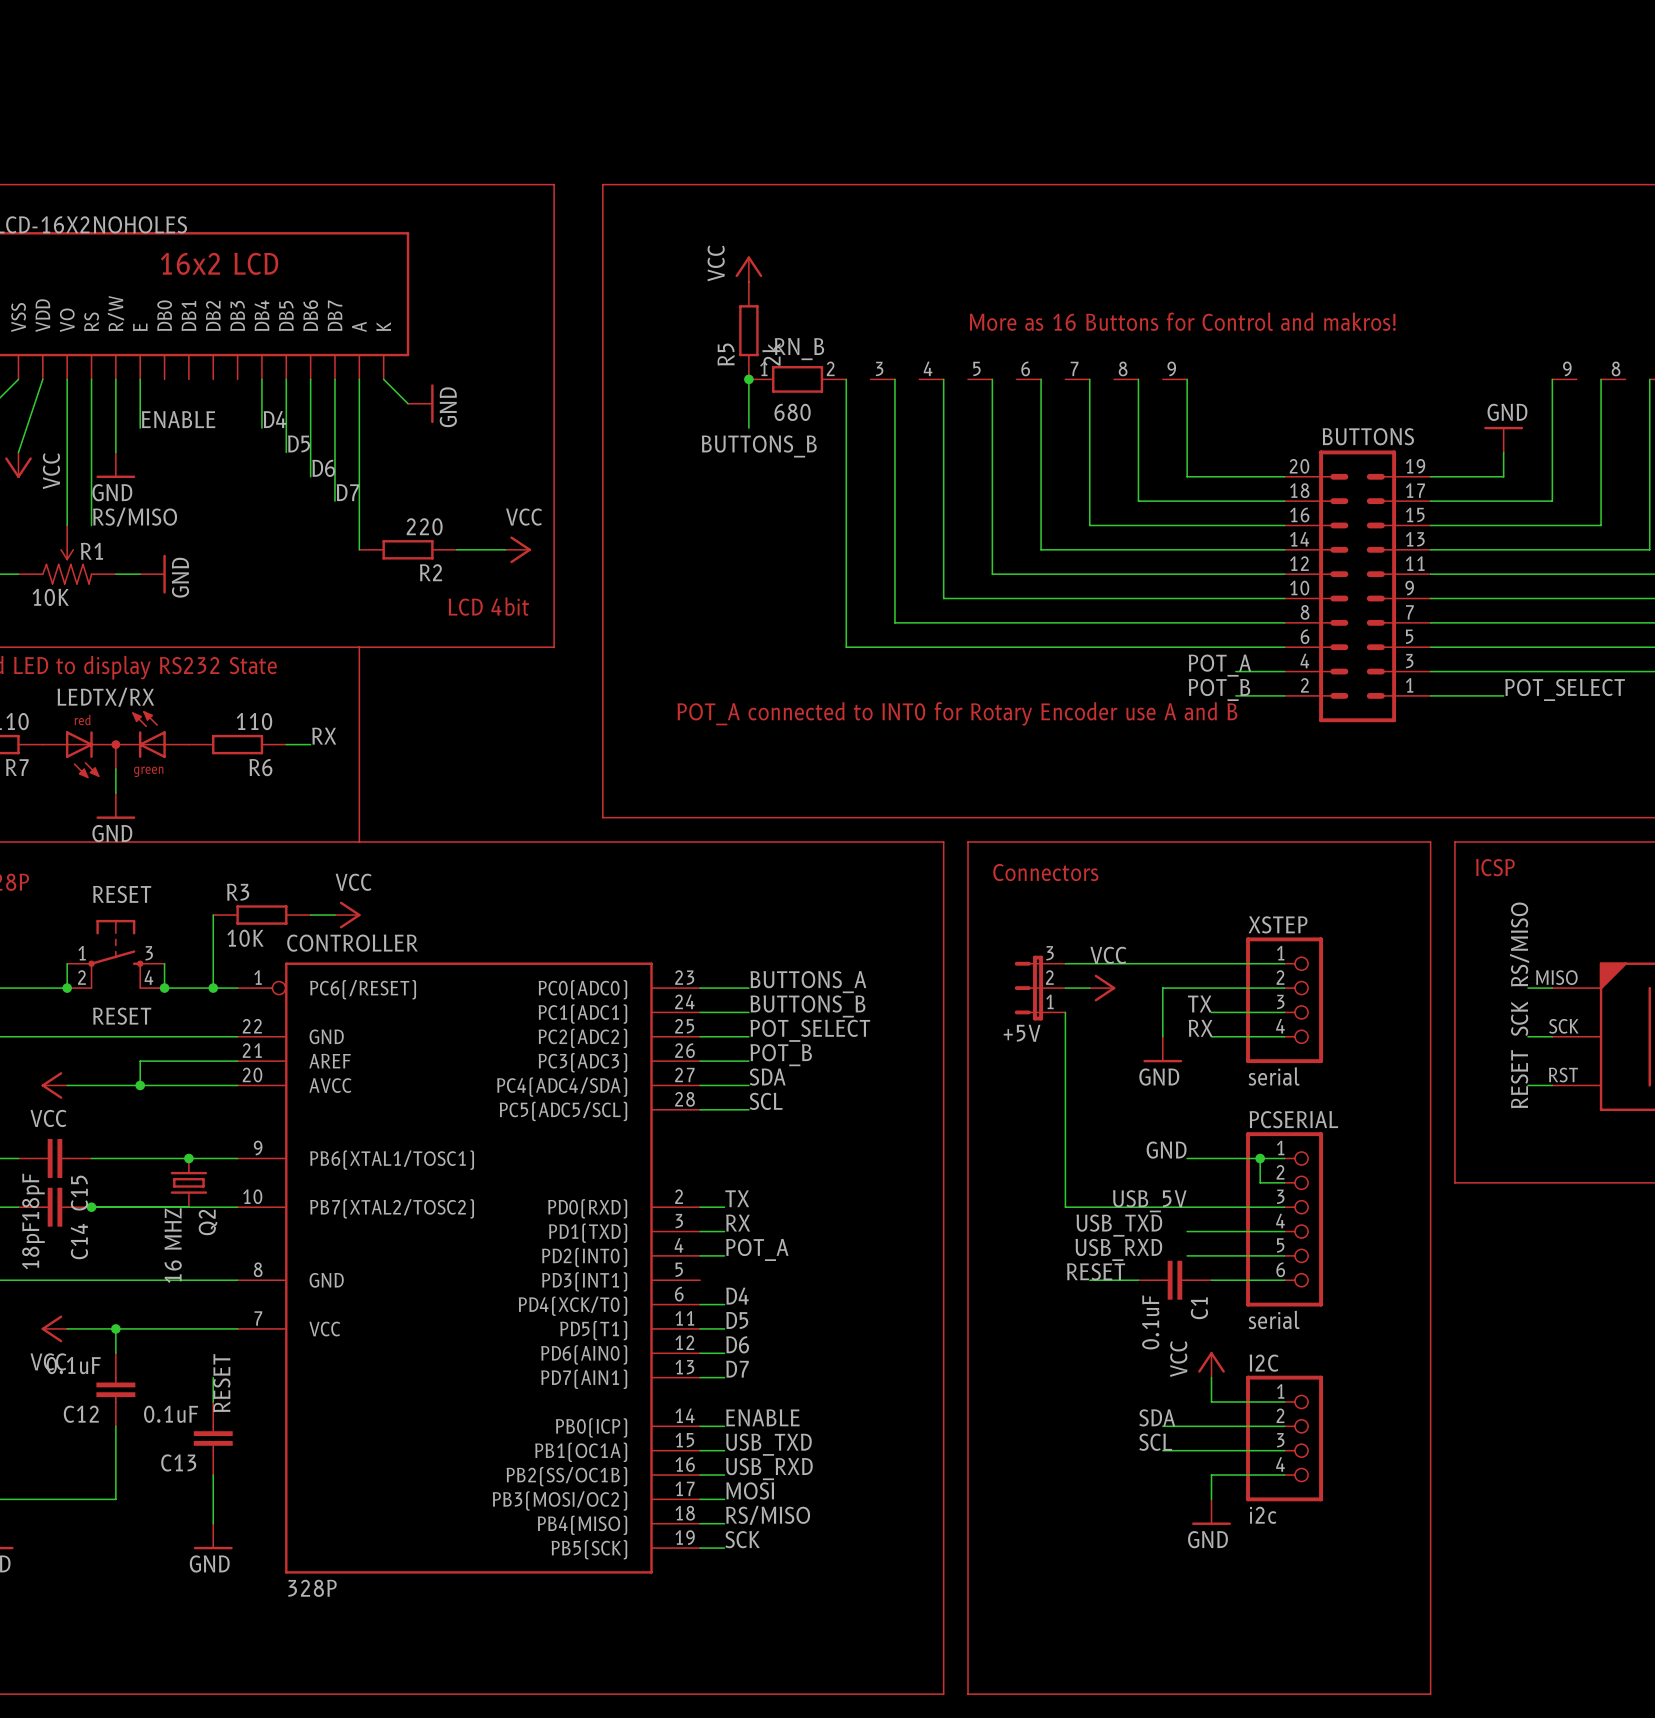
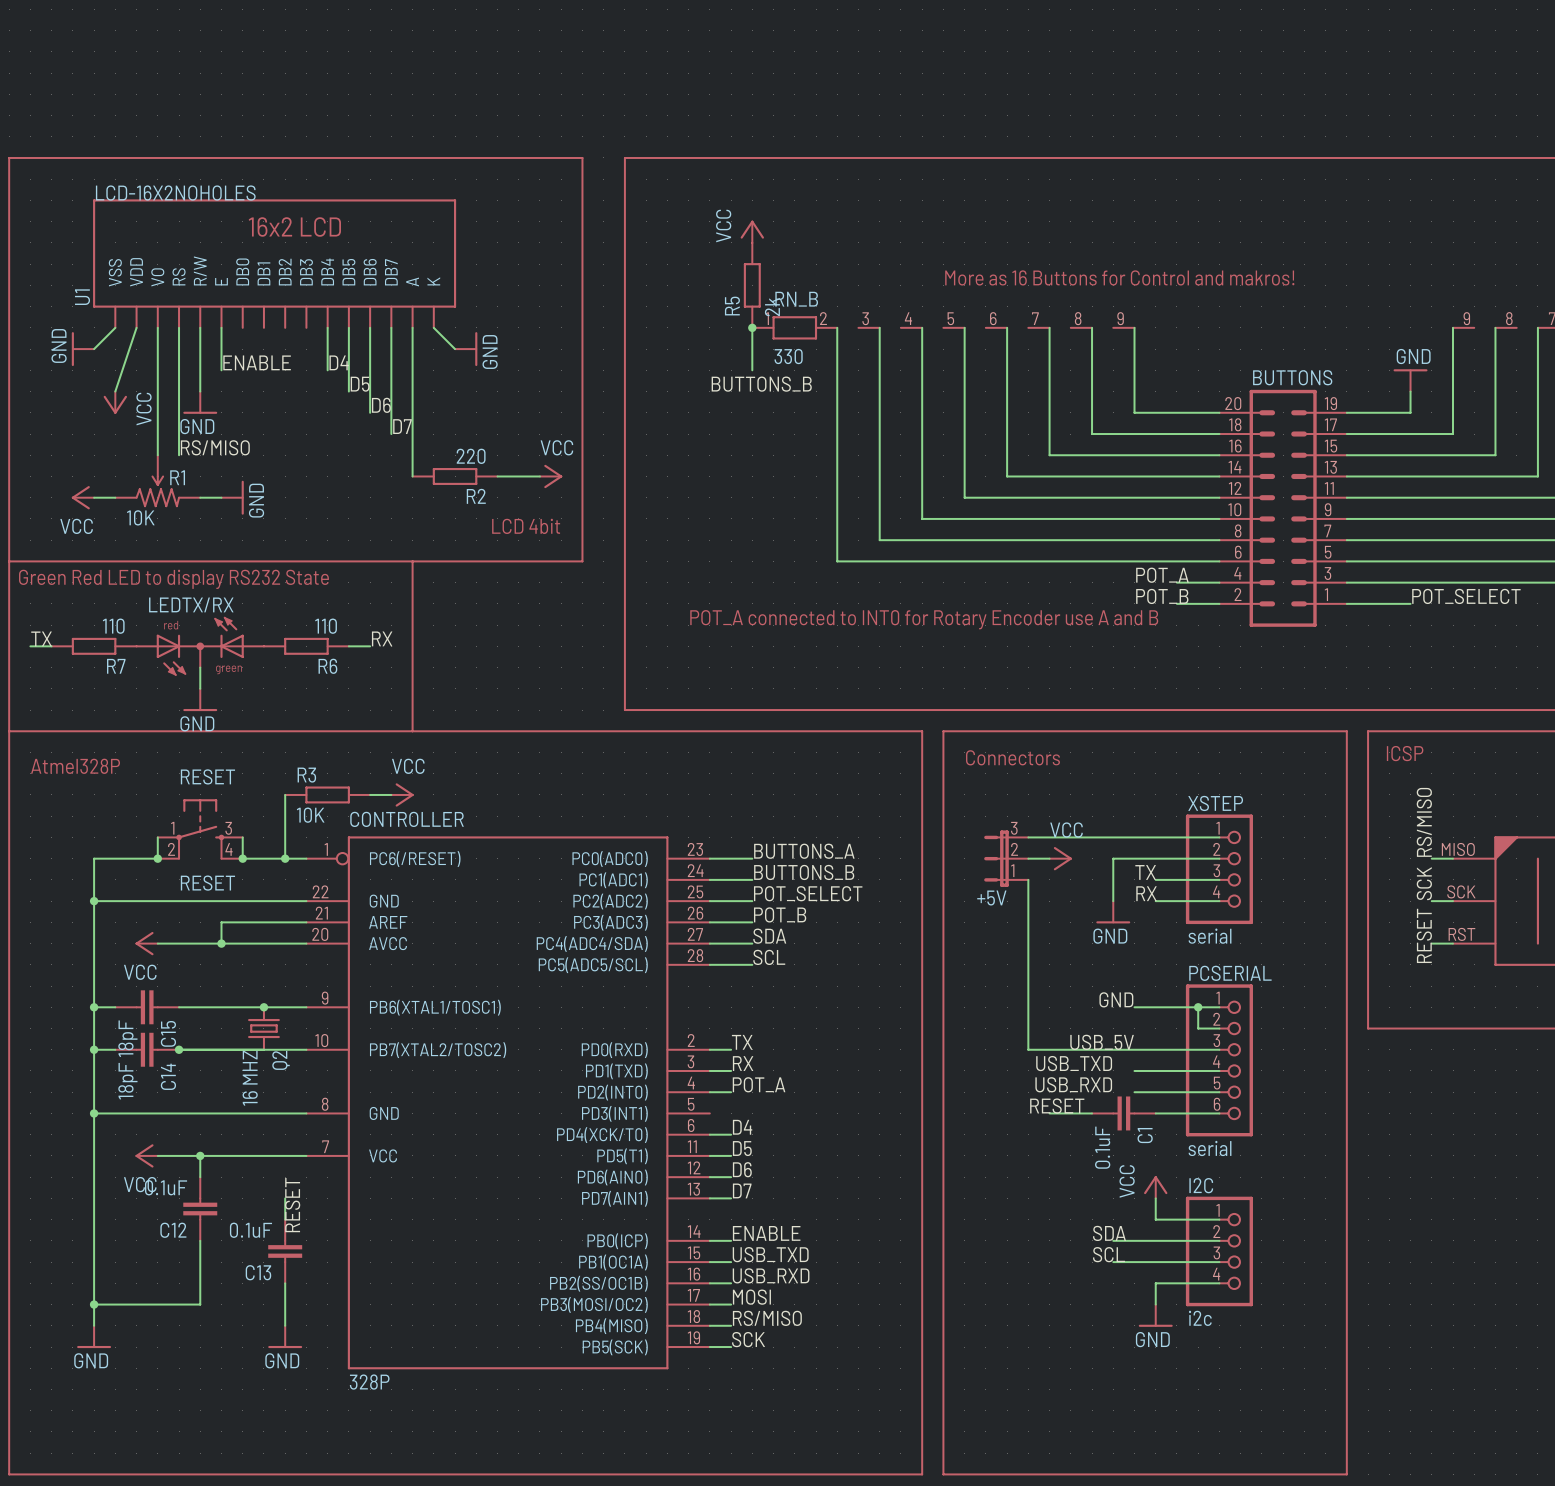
RN_B value: 680 (792, 412) -> 330 (788, 356)

